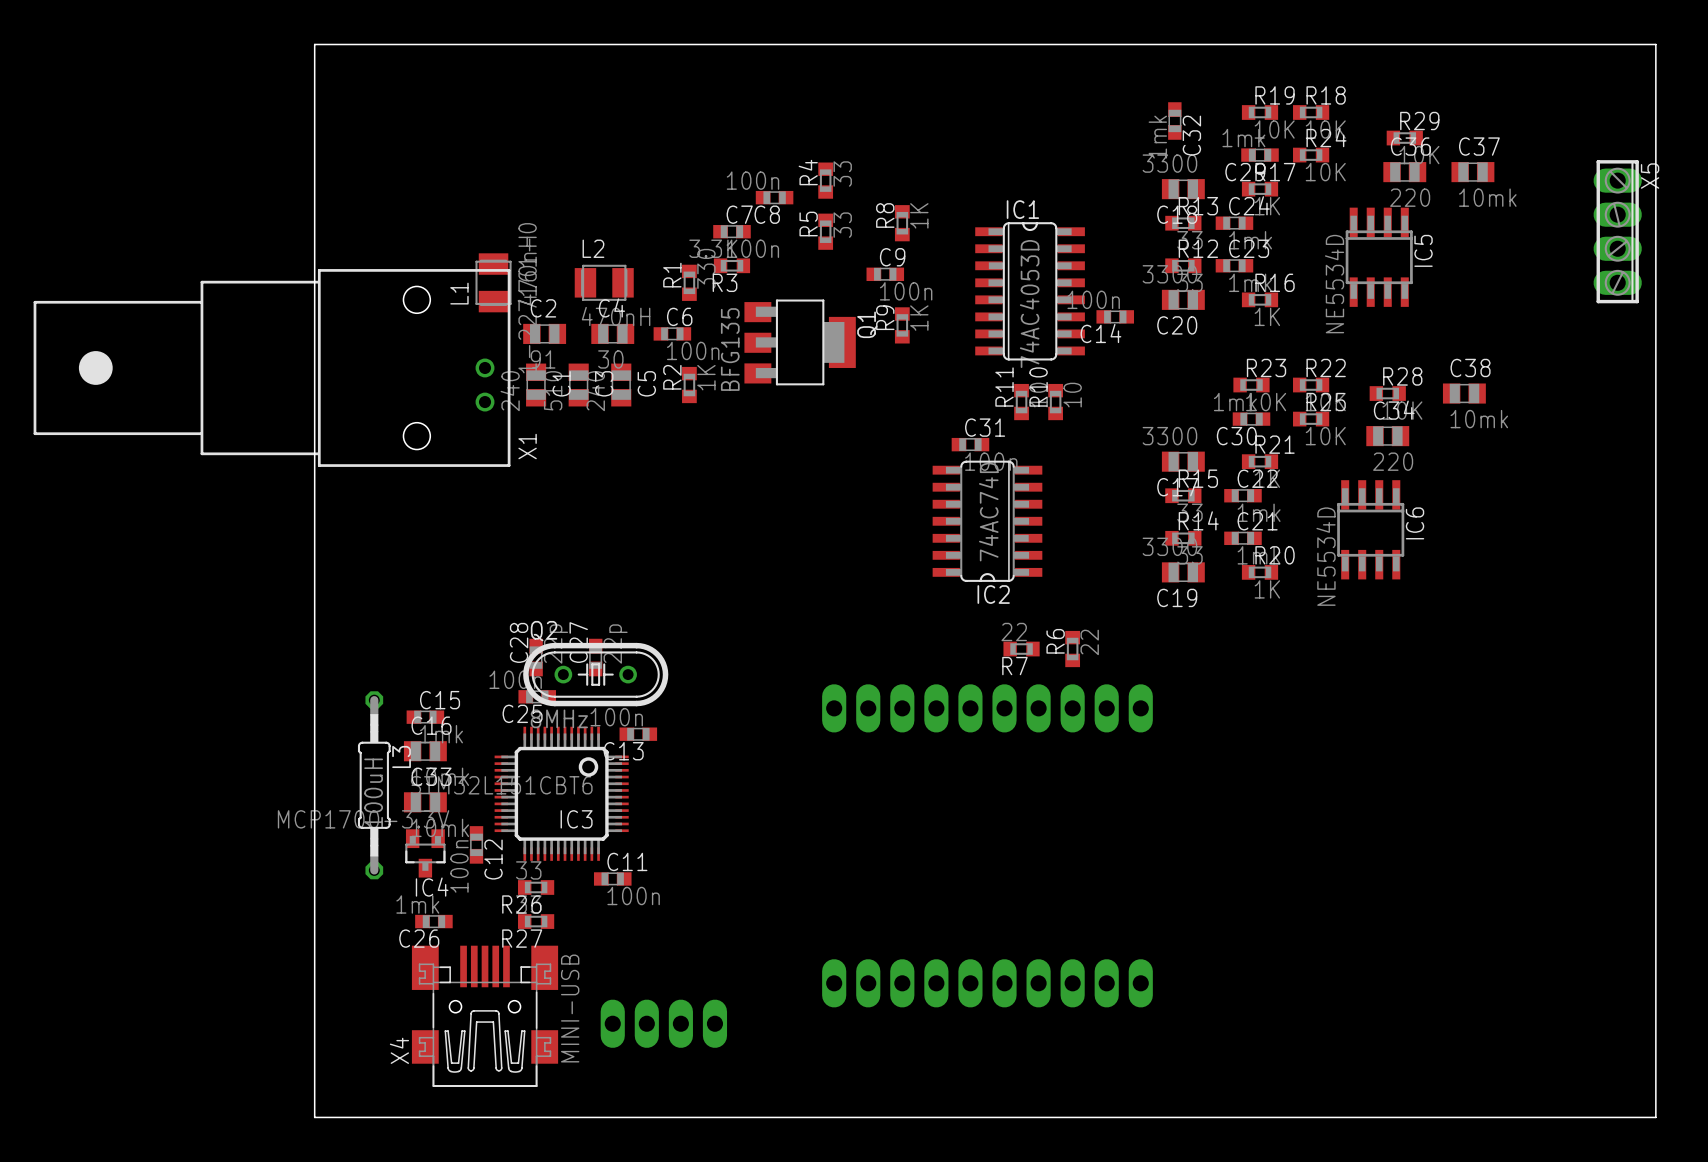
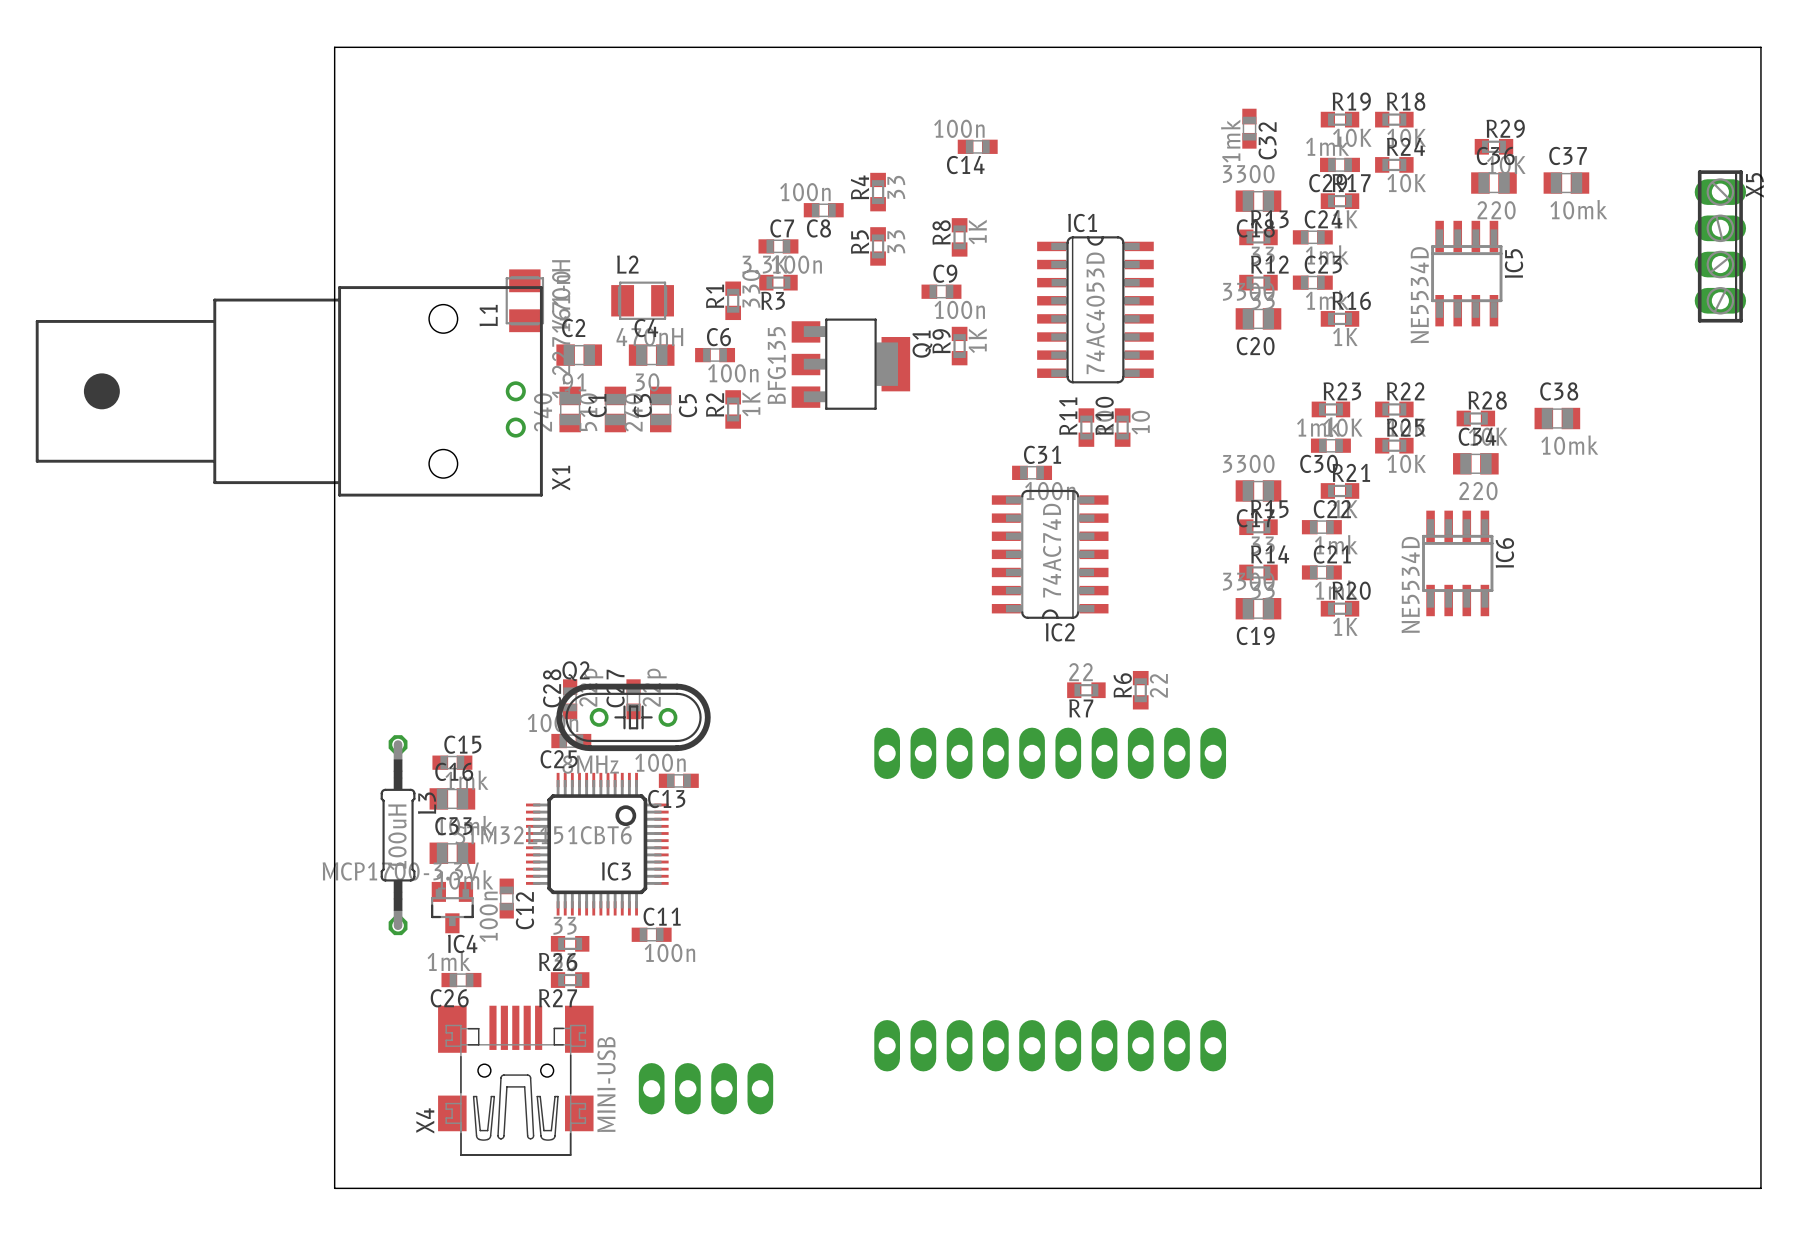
C14 position: (1115, 316) -> (977, 146)

